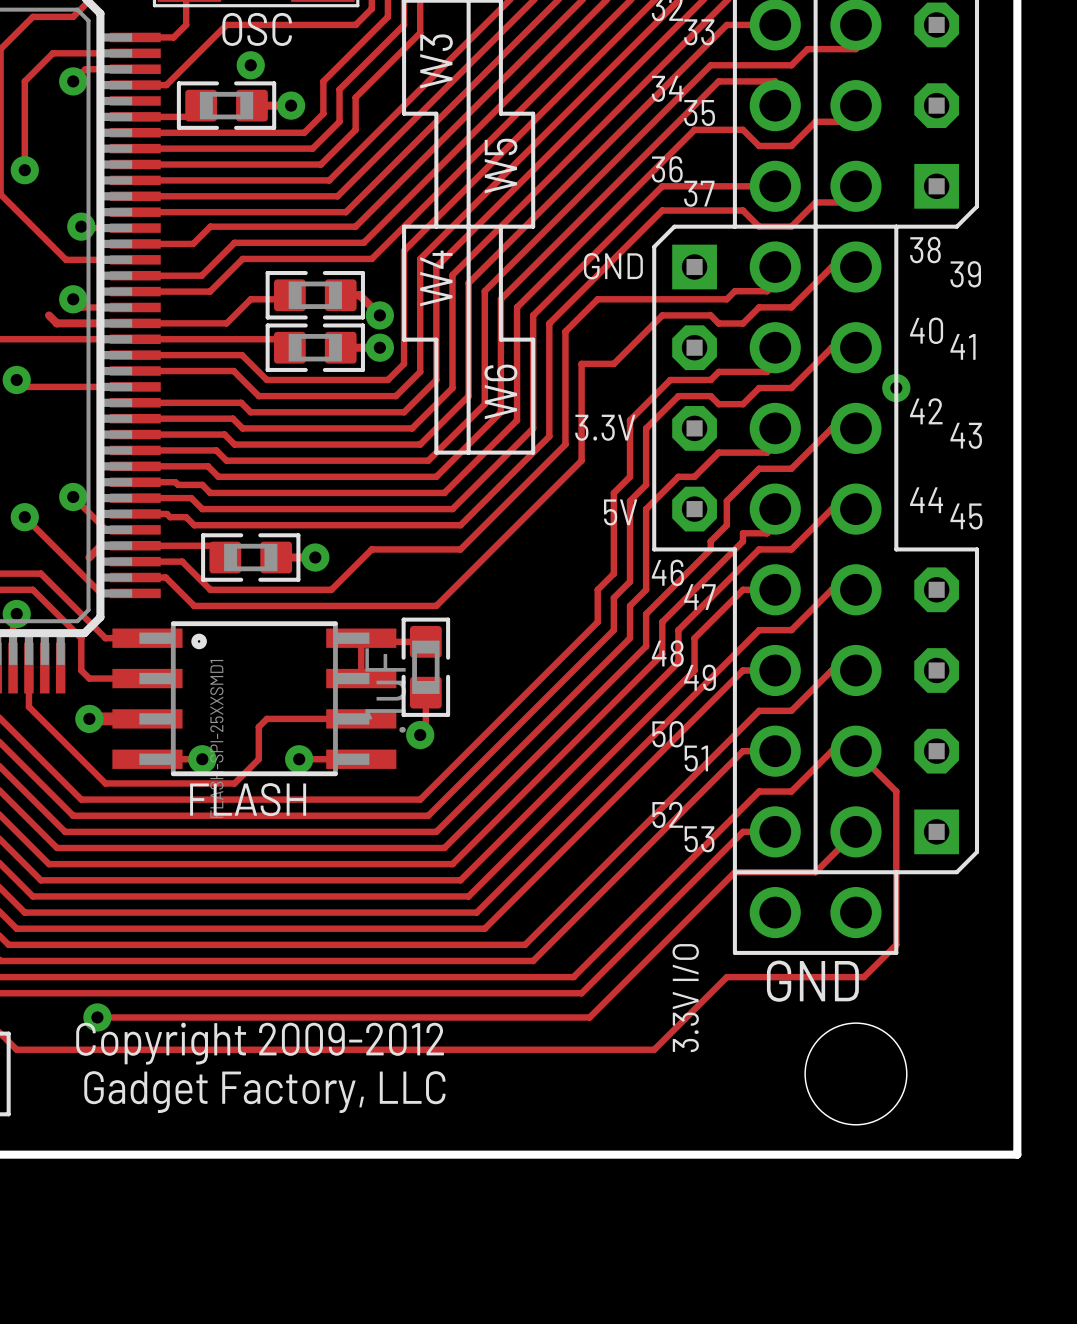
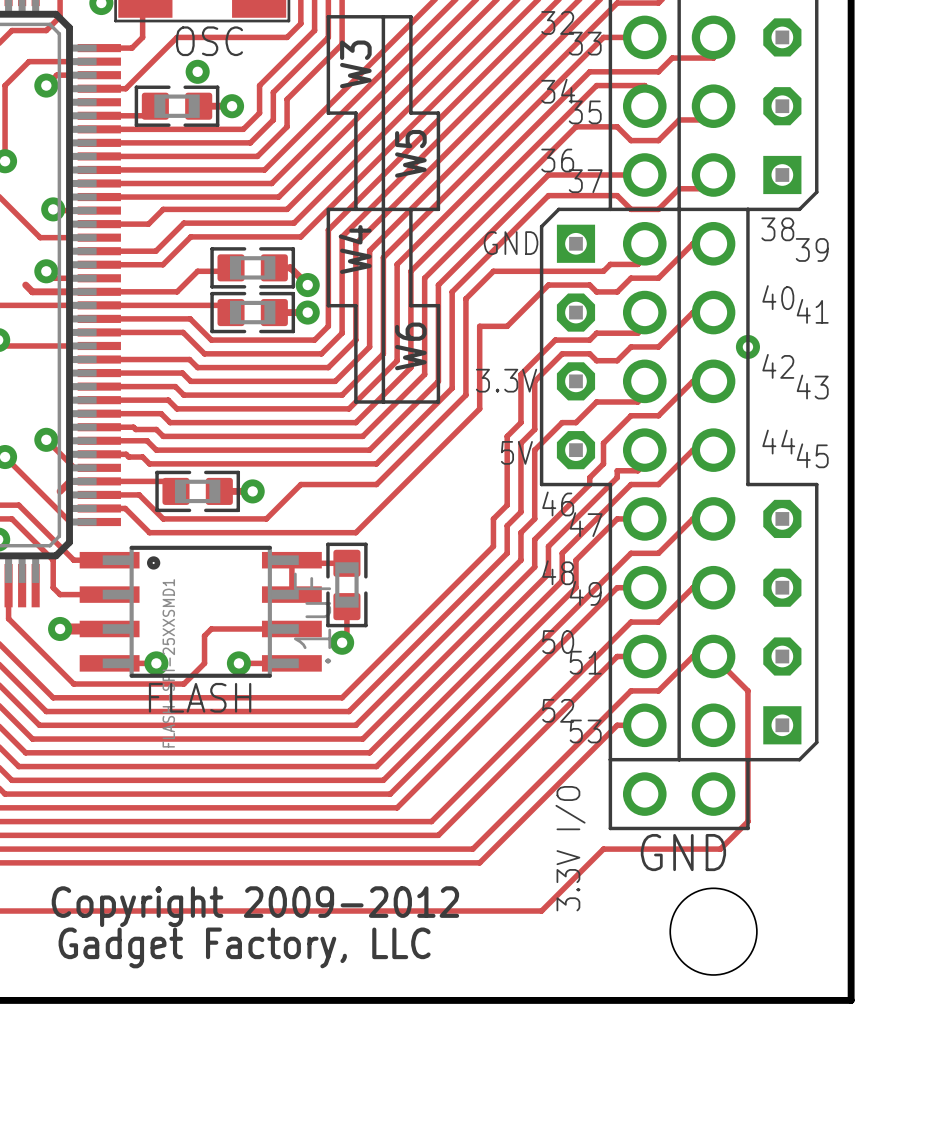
track: (855, 831) (815, 872) (734, 872) (589, 1017) (97, 1017) -> none
via: (97, 1017) -> none

